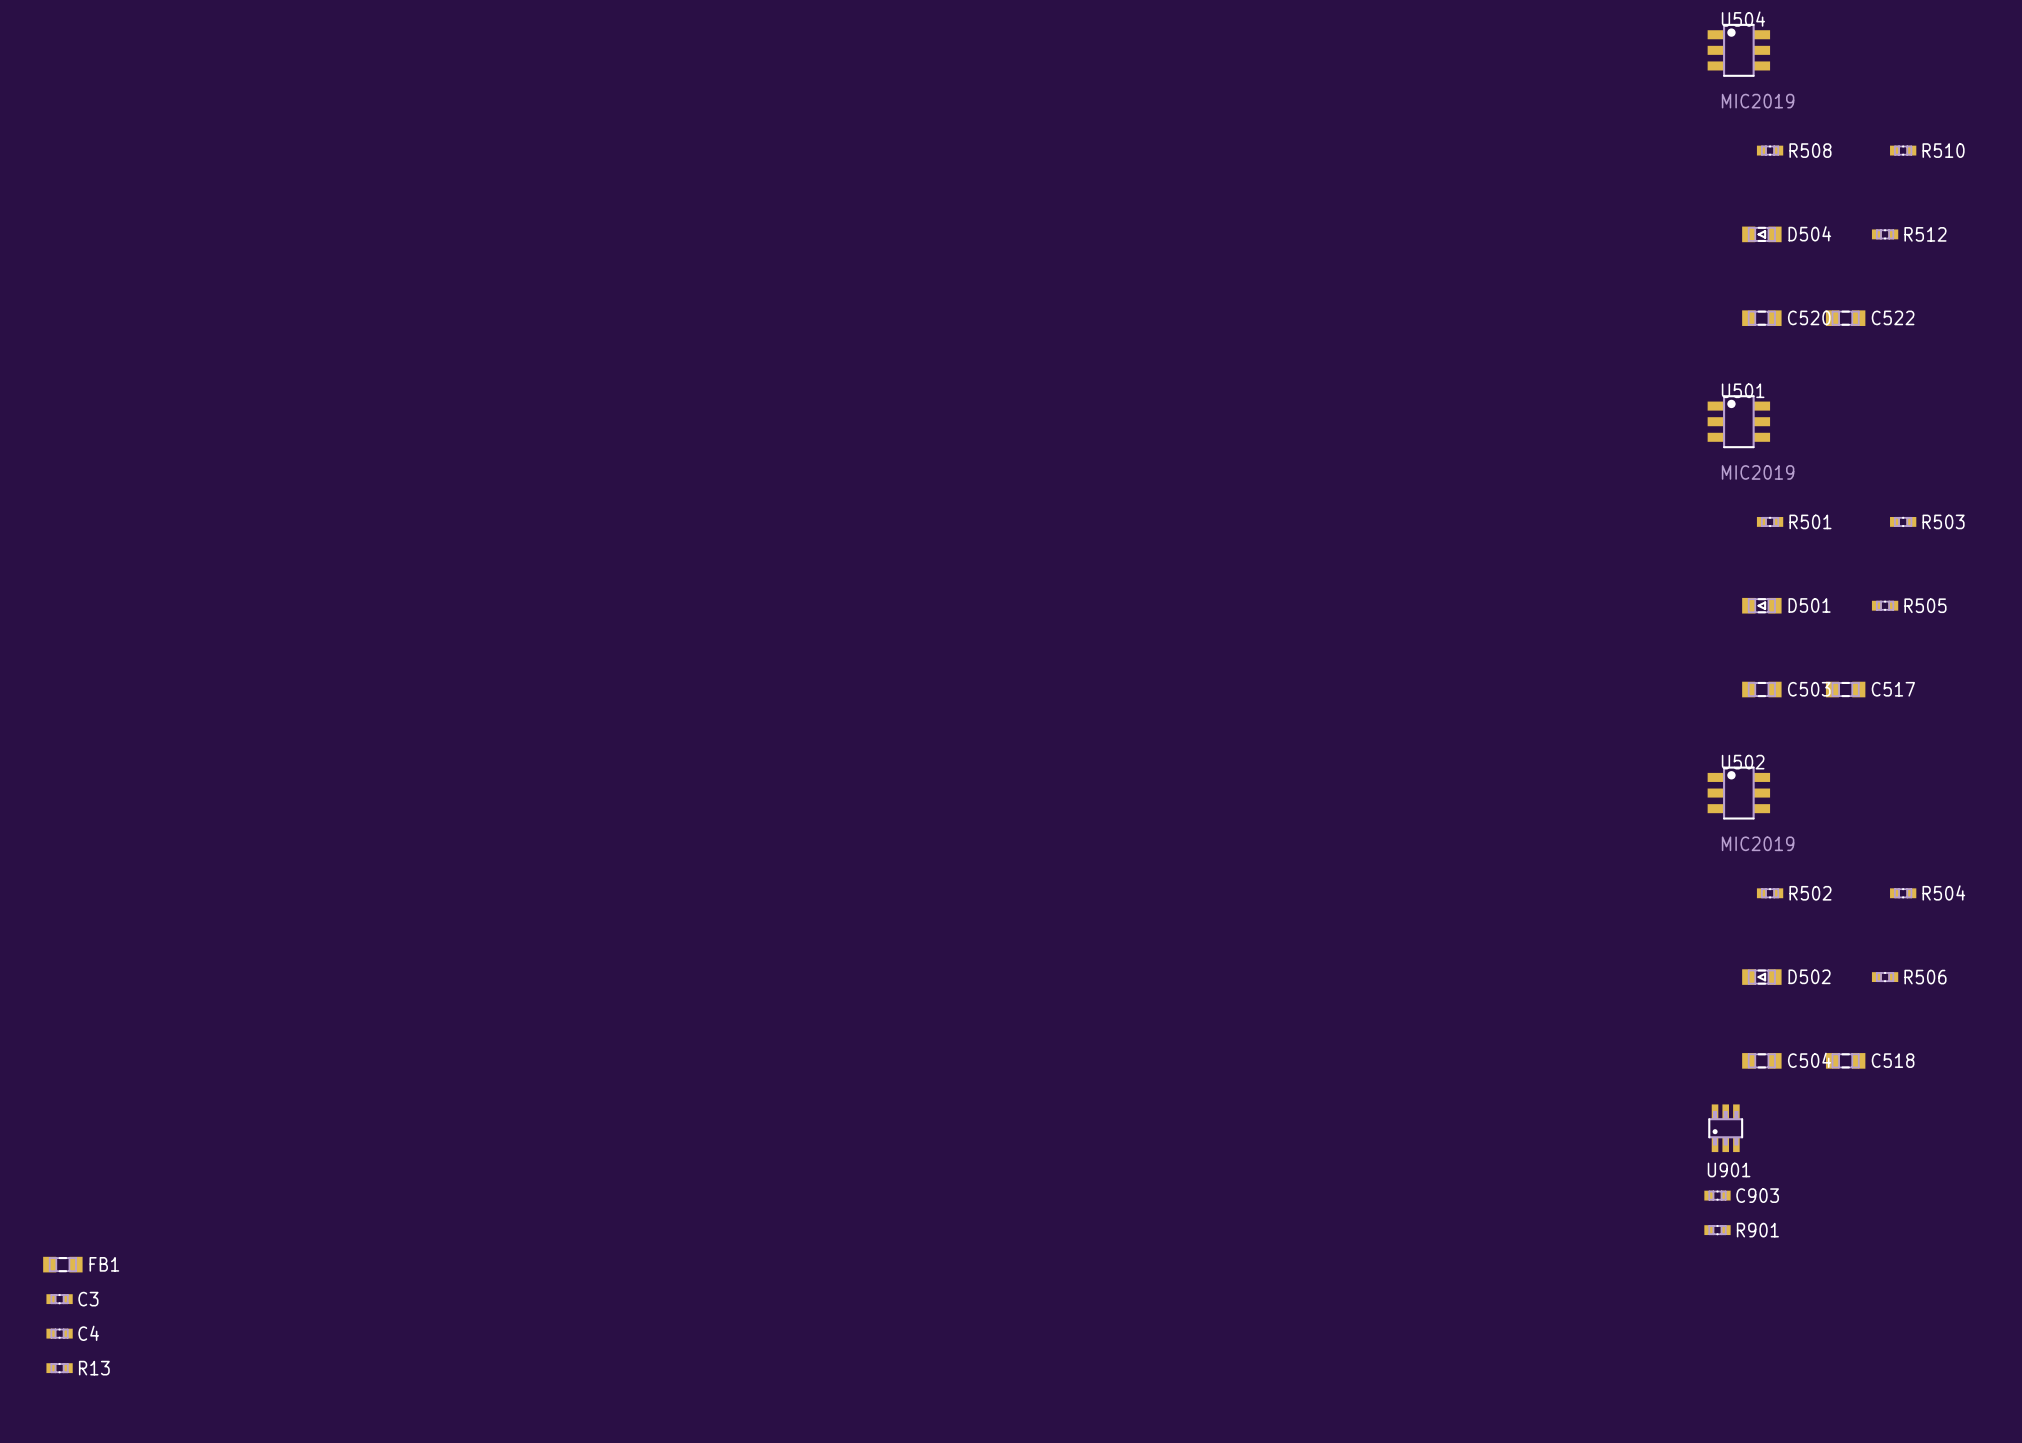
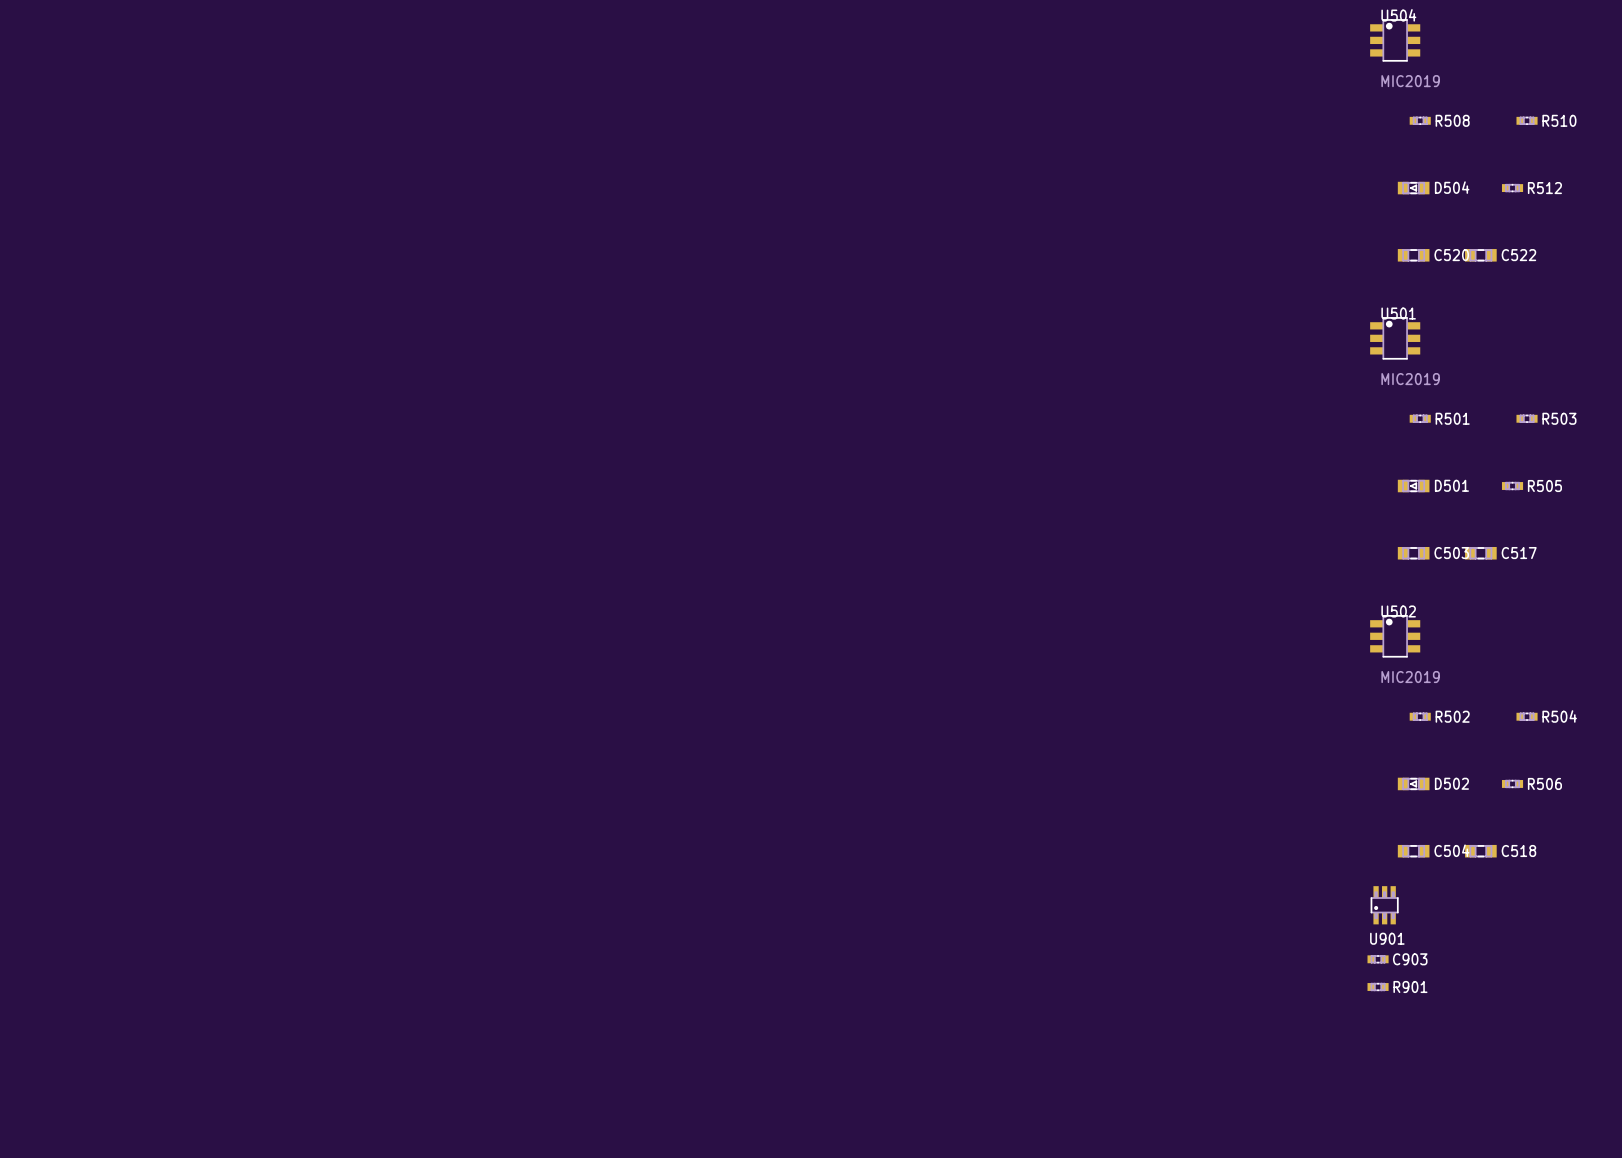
FB1: (62, 1264) -> none
C3: (59, 1299) -> none
C4: (59, 1333) -> none
R13: (59, 1368) -> none

